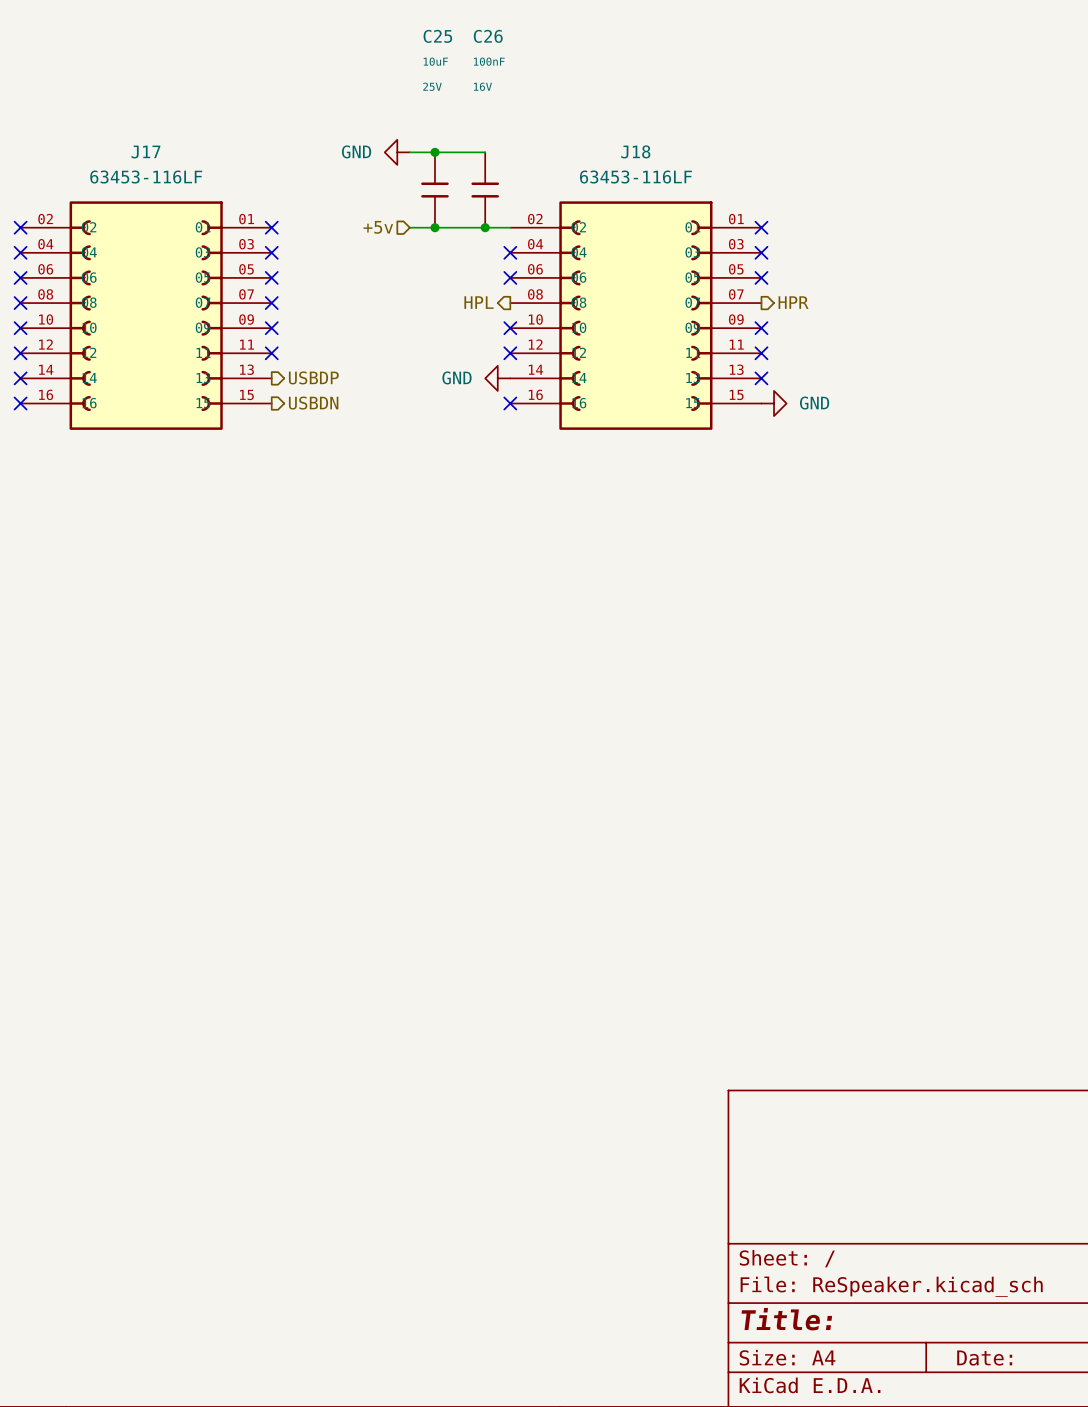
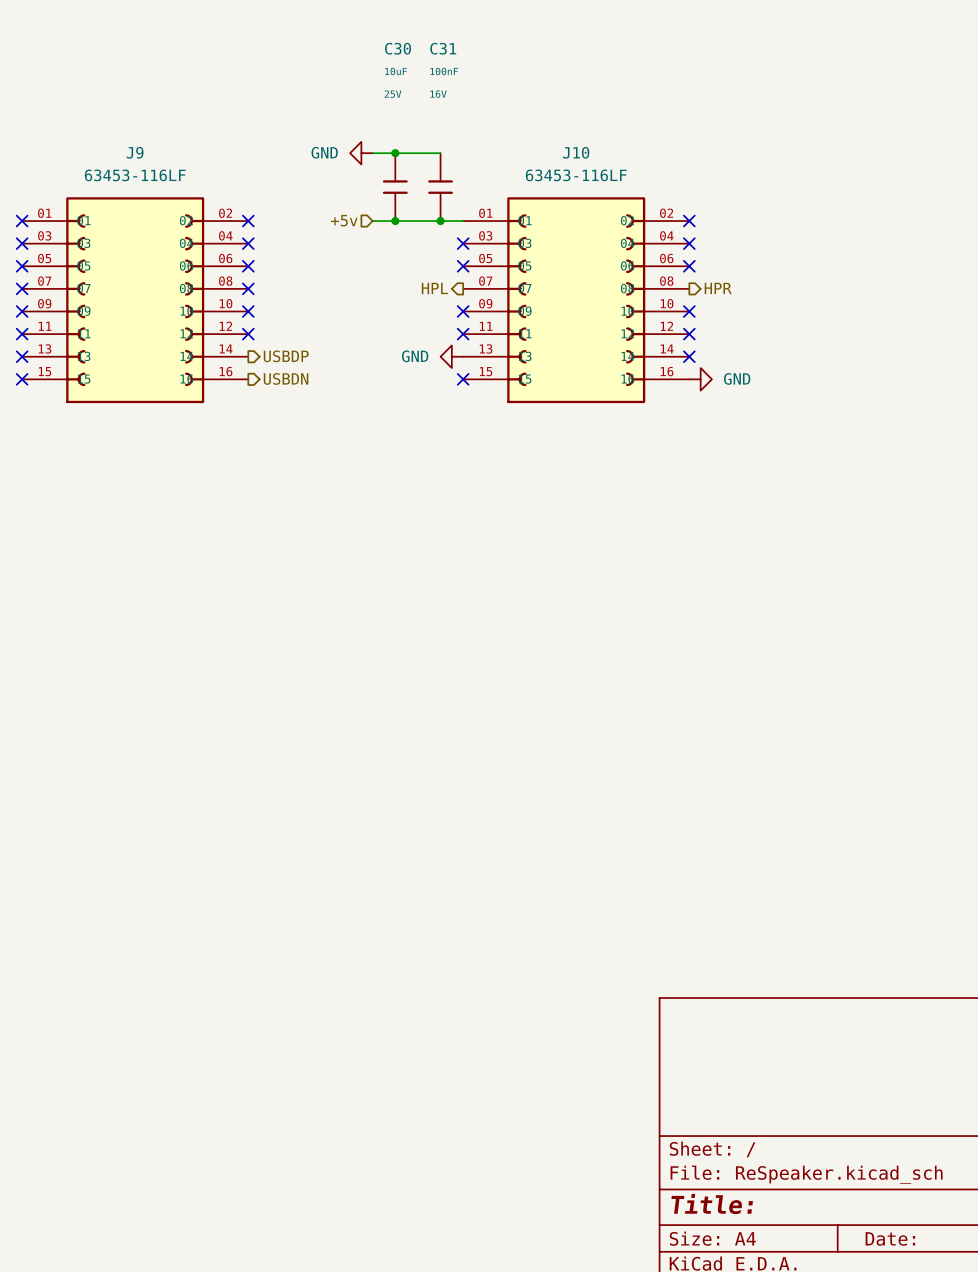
C25 name: C25 (437, 36) -> C30 (398, 48)
C26 name: C26 (488, 36) -> C31 (443, 48)
J18 name: J18 (635, 151) -> J10 (576, 152)
J17 name: J17 (145, 152) -> J9 (135, 152)
J17 flip: as is (146, 315) -> left-right (135, 300)
J18 flip: as is (635, 315) -> left-right (576, 300)

